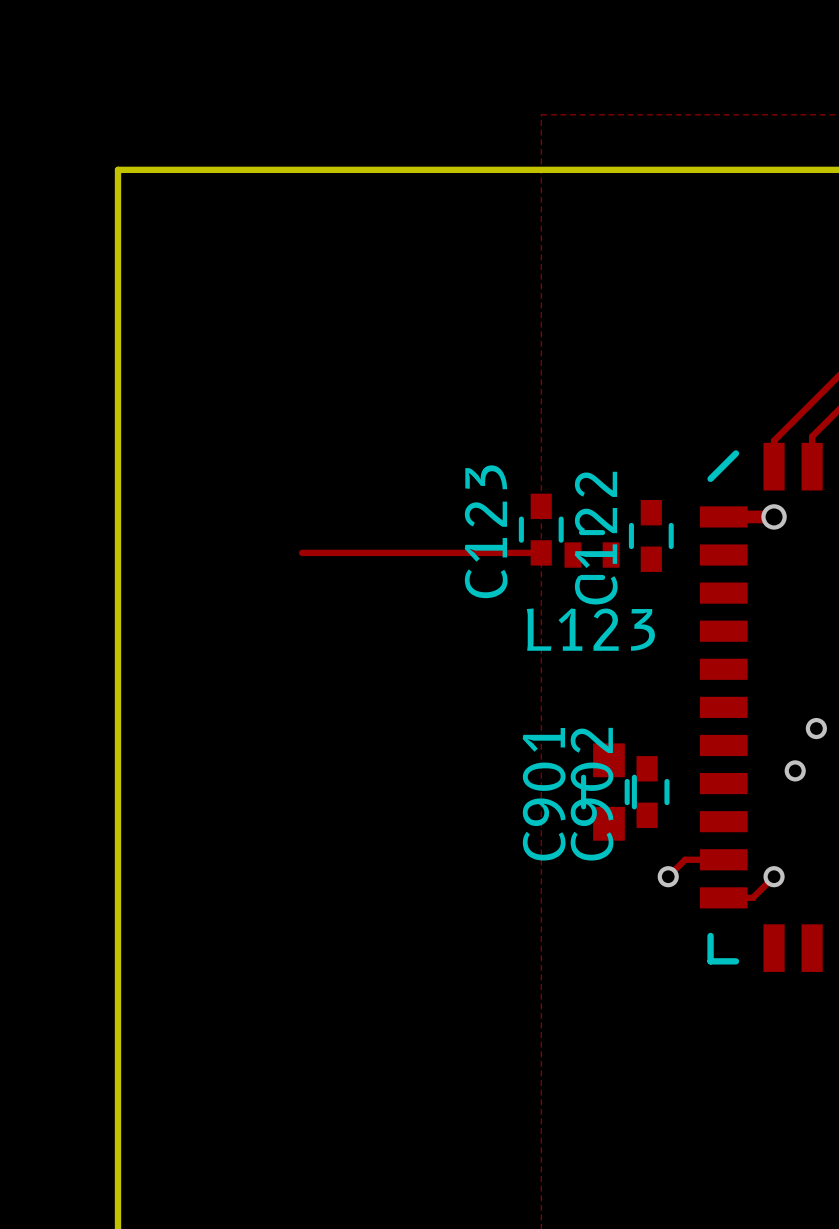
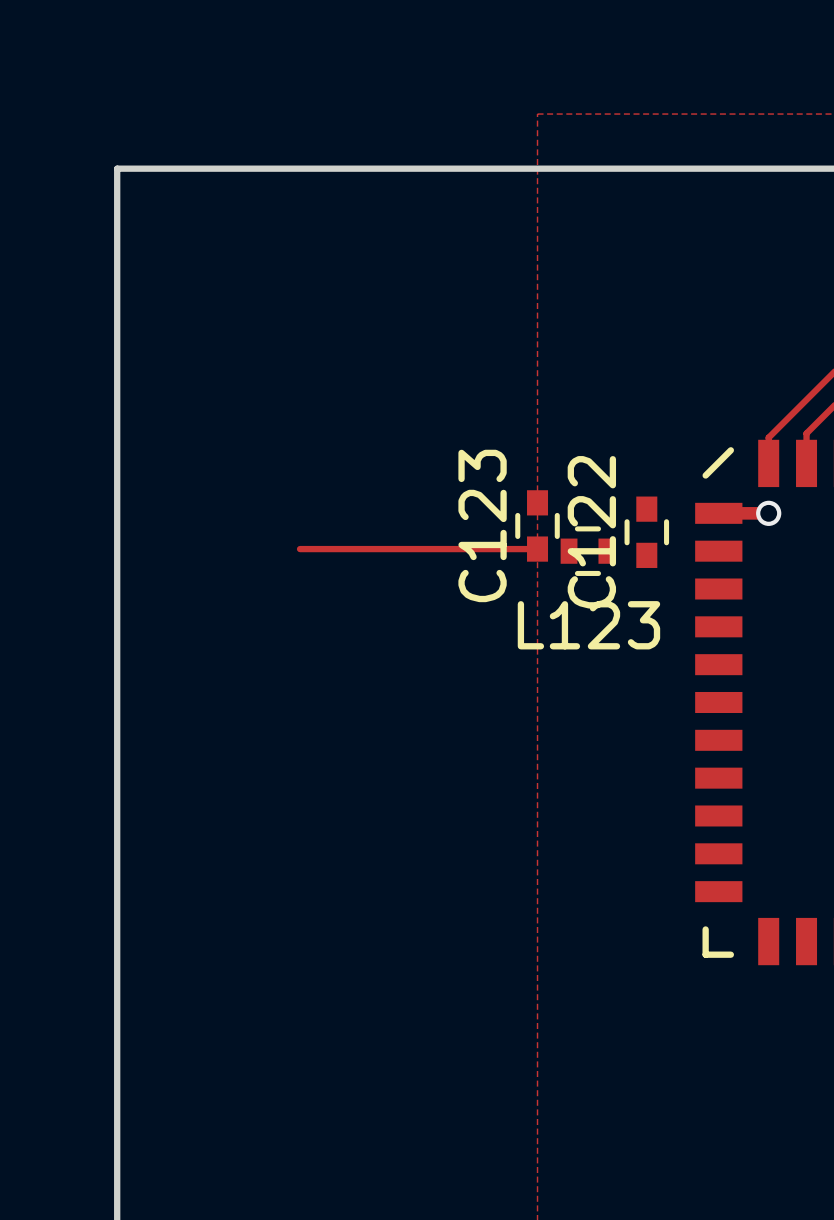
via: (816, 728) -> none
via: (795, 770) -> none
C901: (608, 792) -> none
C902: (647, 792) -> none
track: (723, 859) (685, 859) (668, 876) -> none
via: (668, 876) -> none
track: (774, 876) (752, 897) (723, 897) -> none
via: (774, 876) -> none

